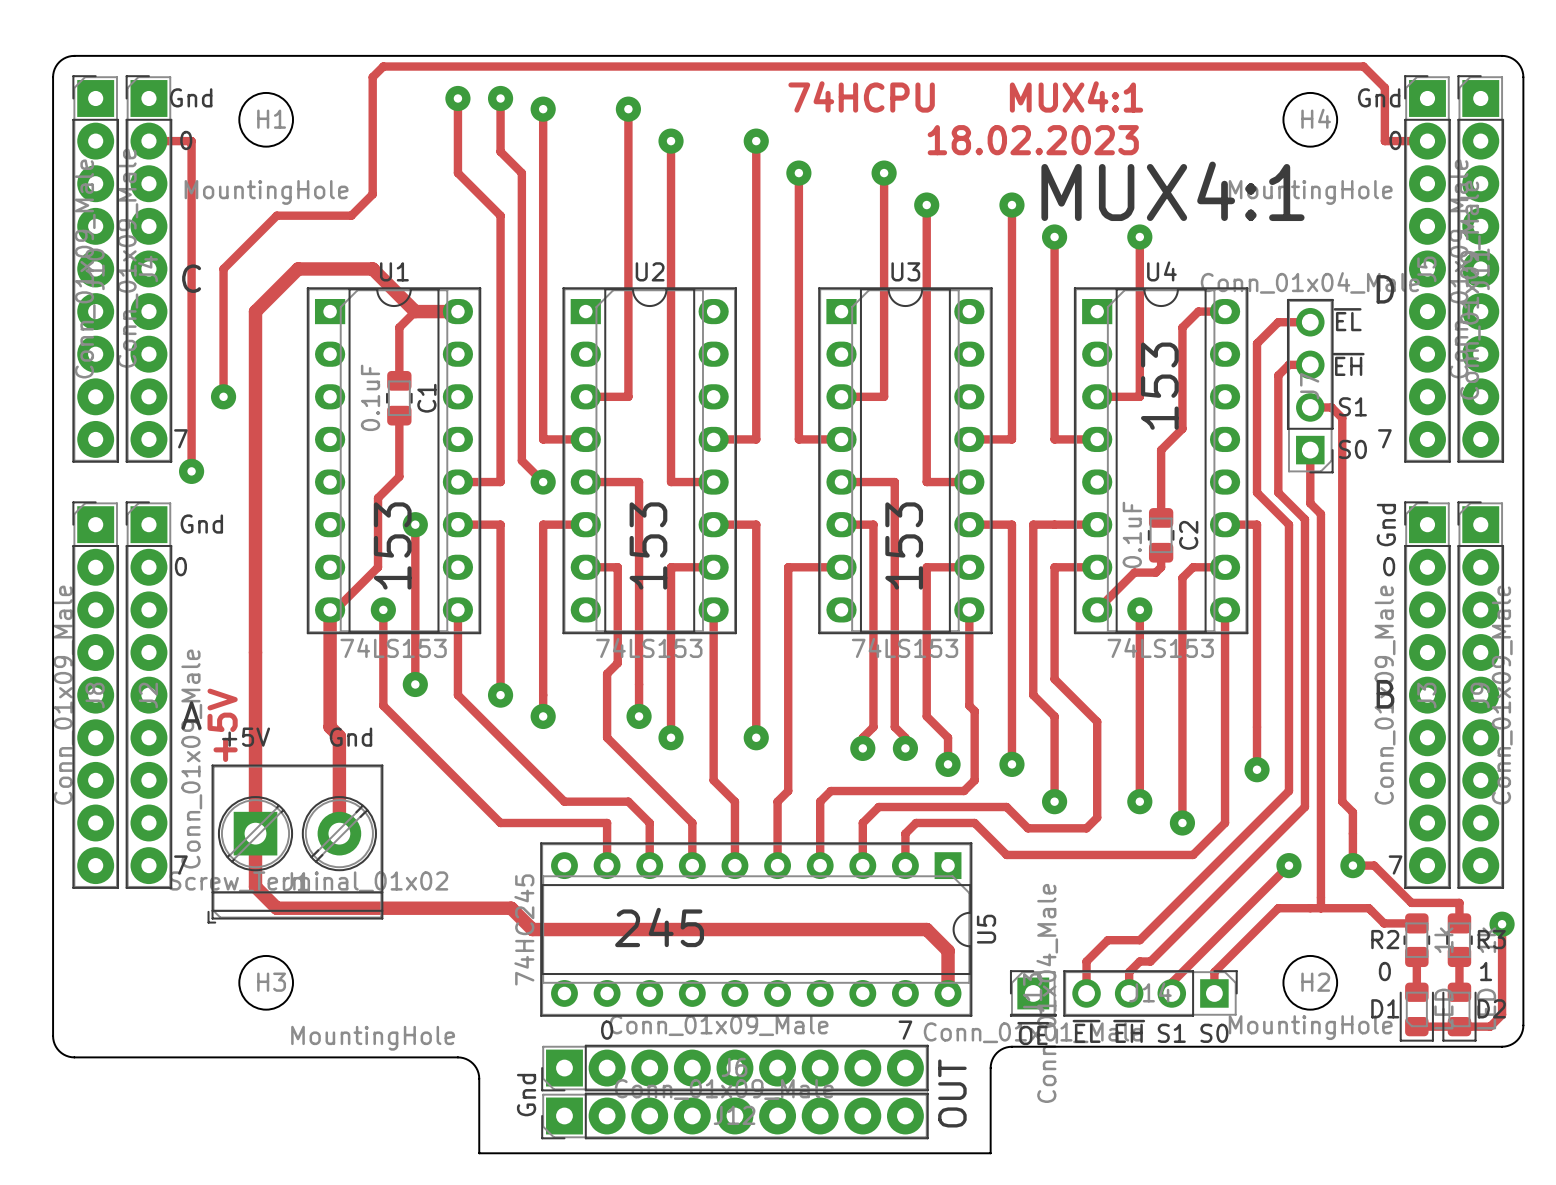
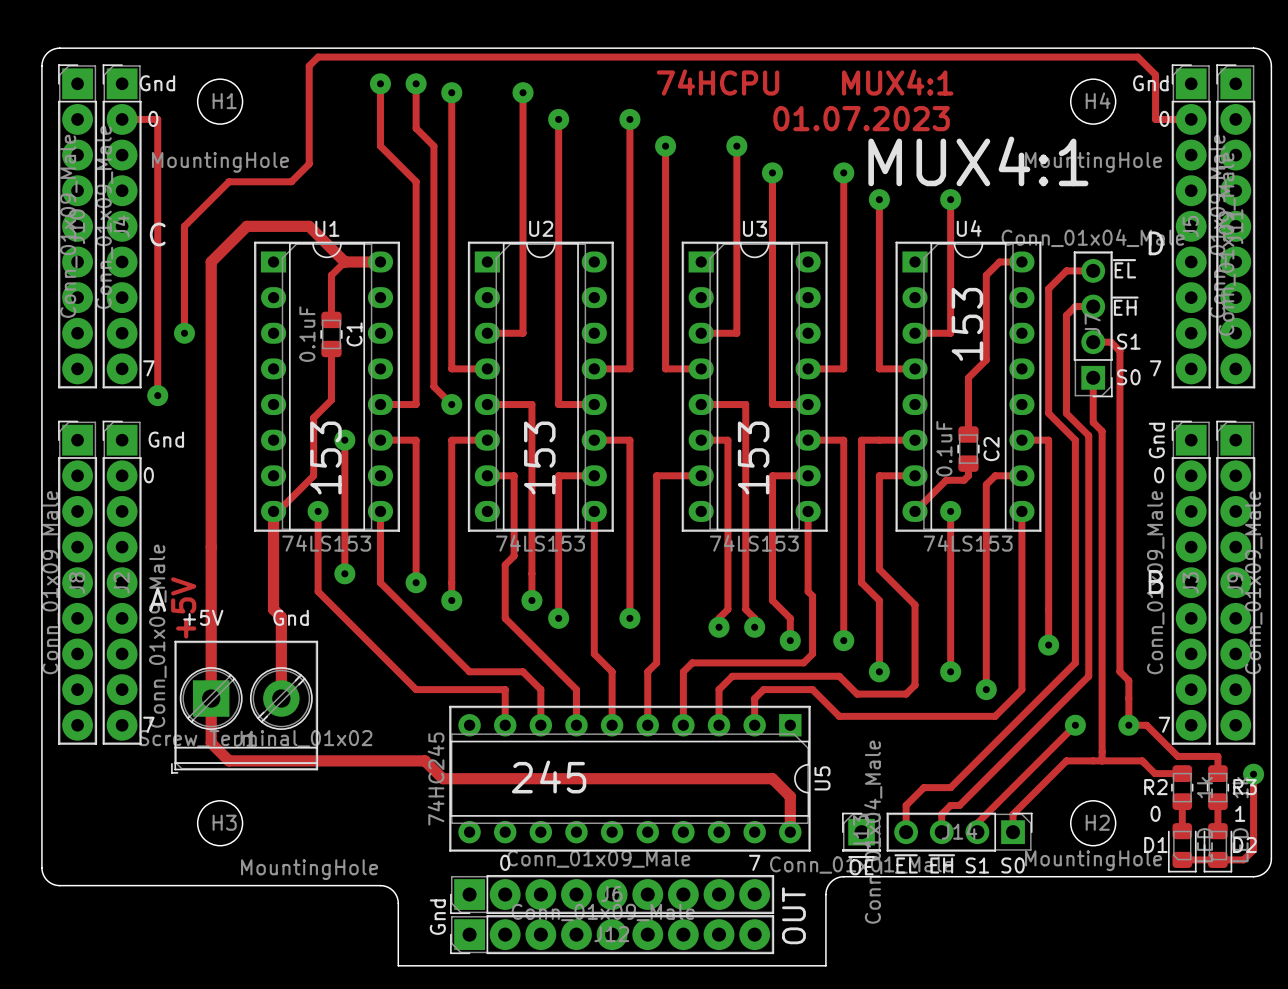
text: 18.02.2023 (1033, 140) -> 01.07.2023 (861, 118)

